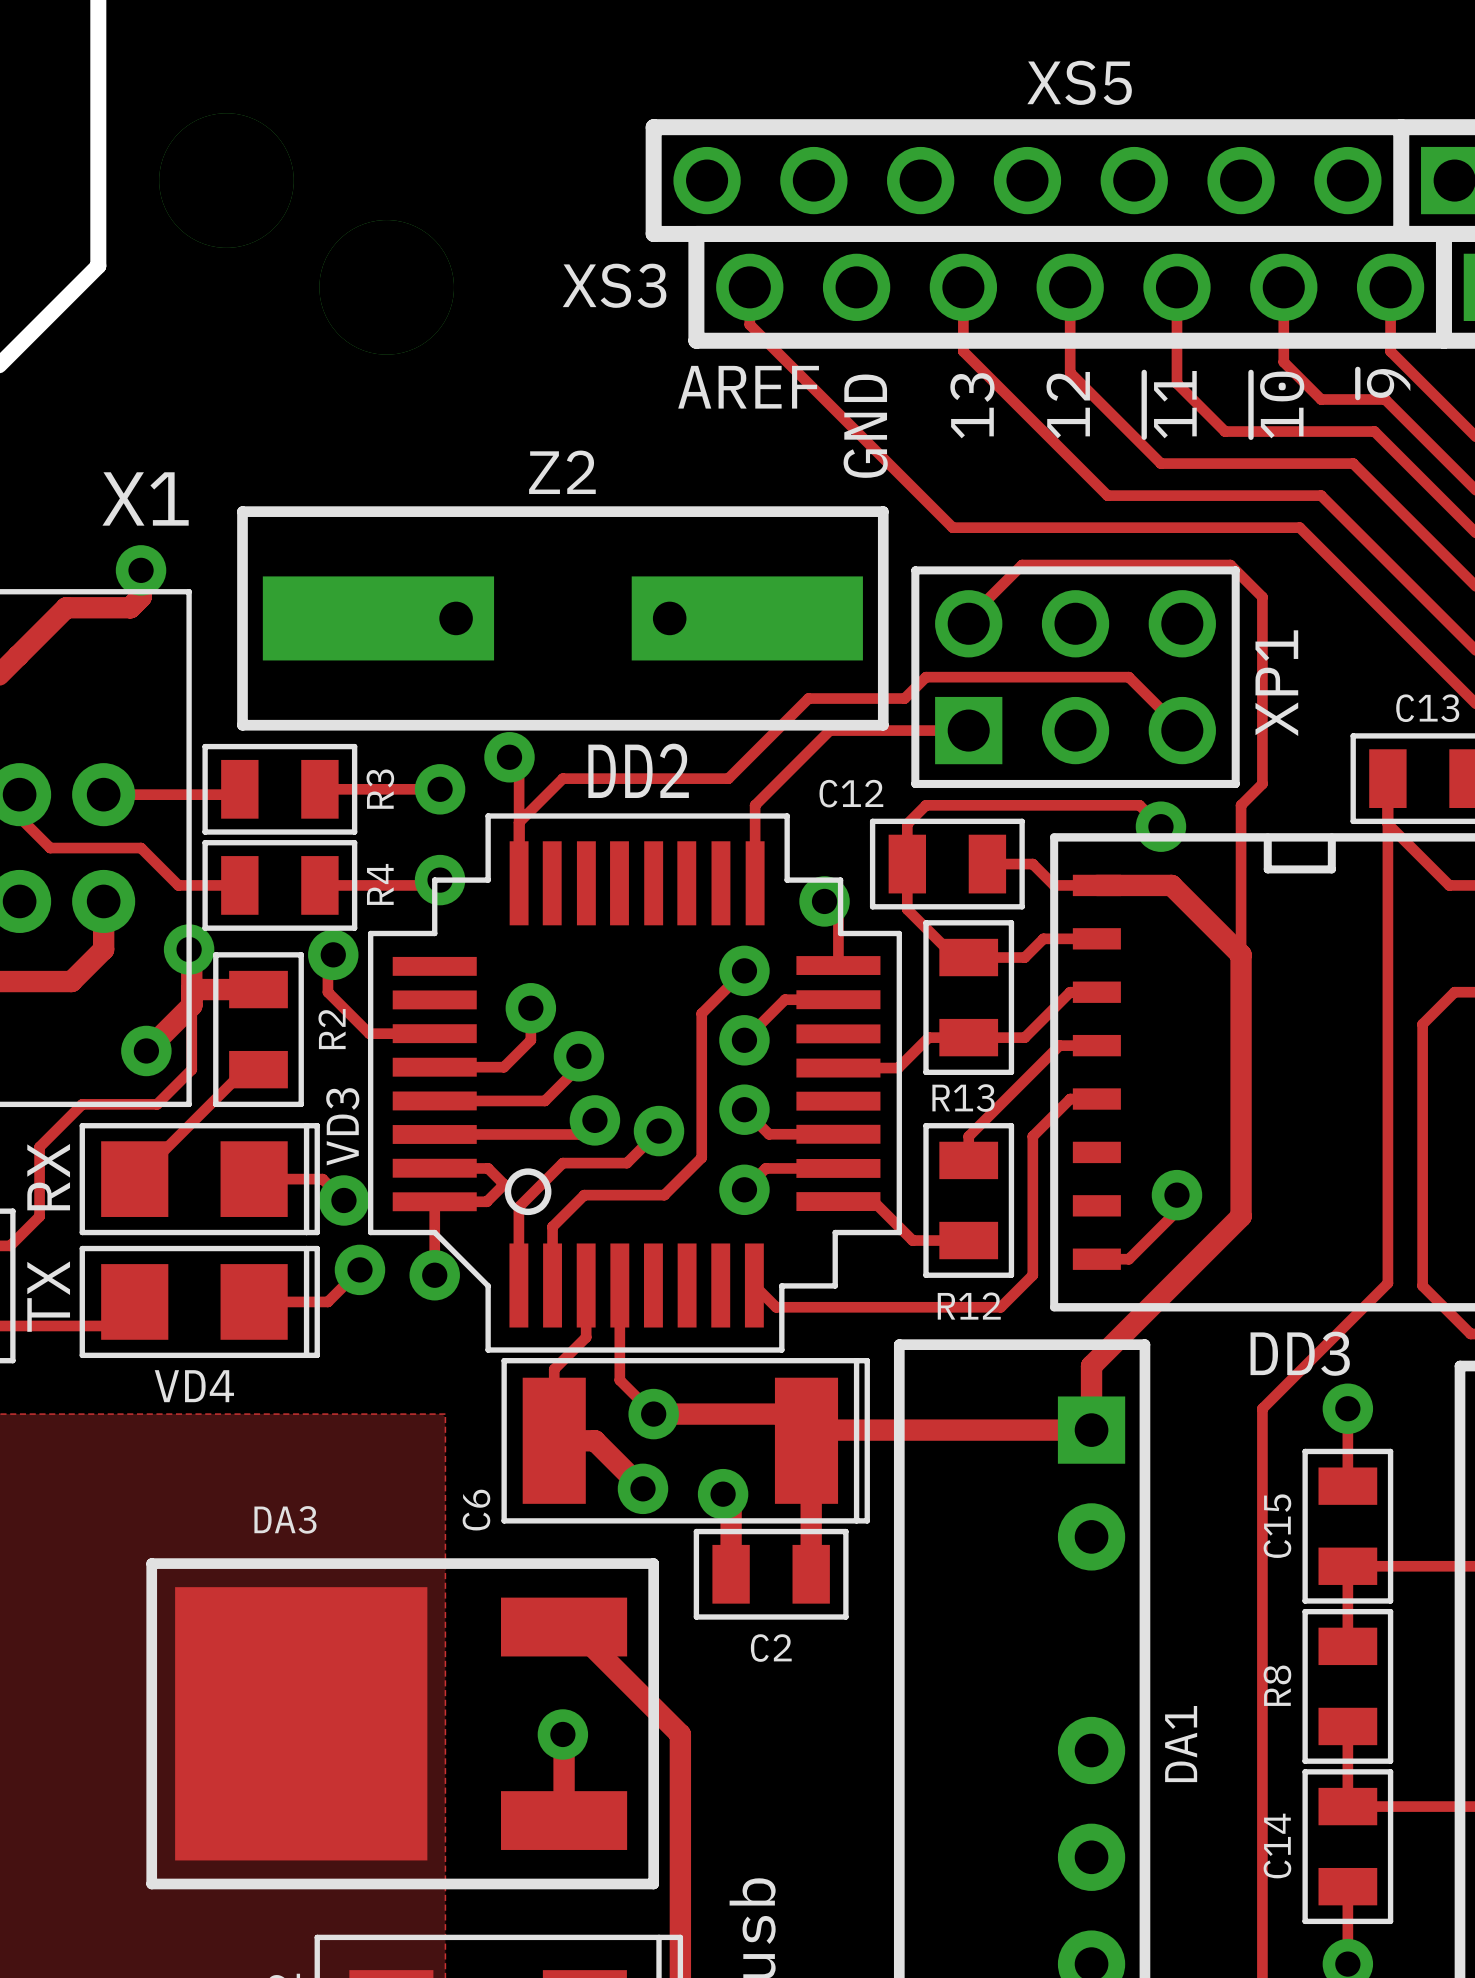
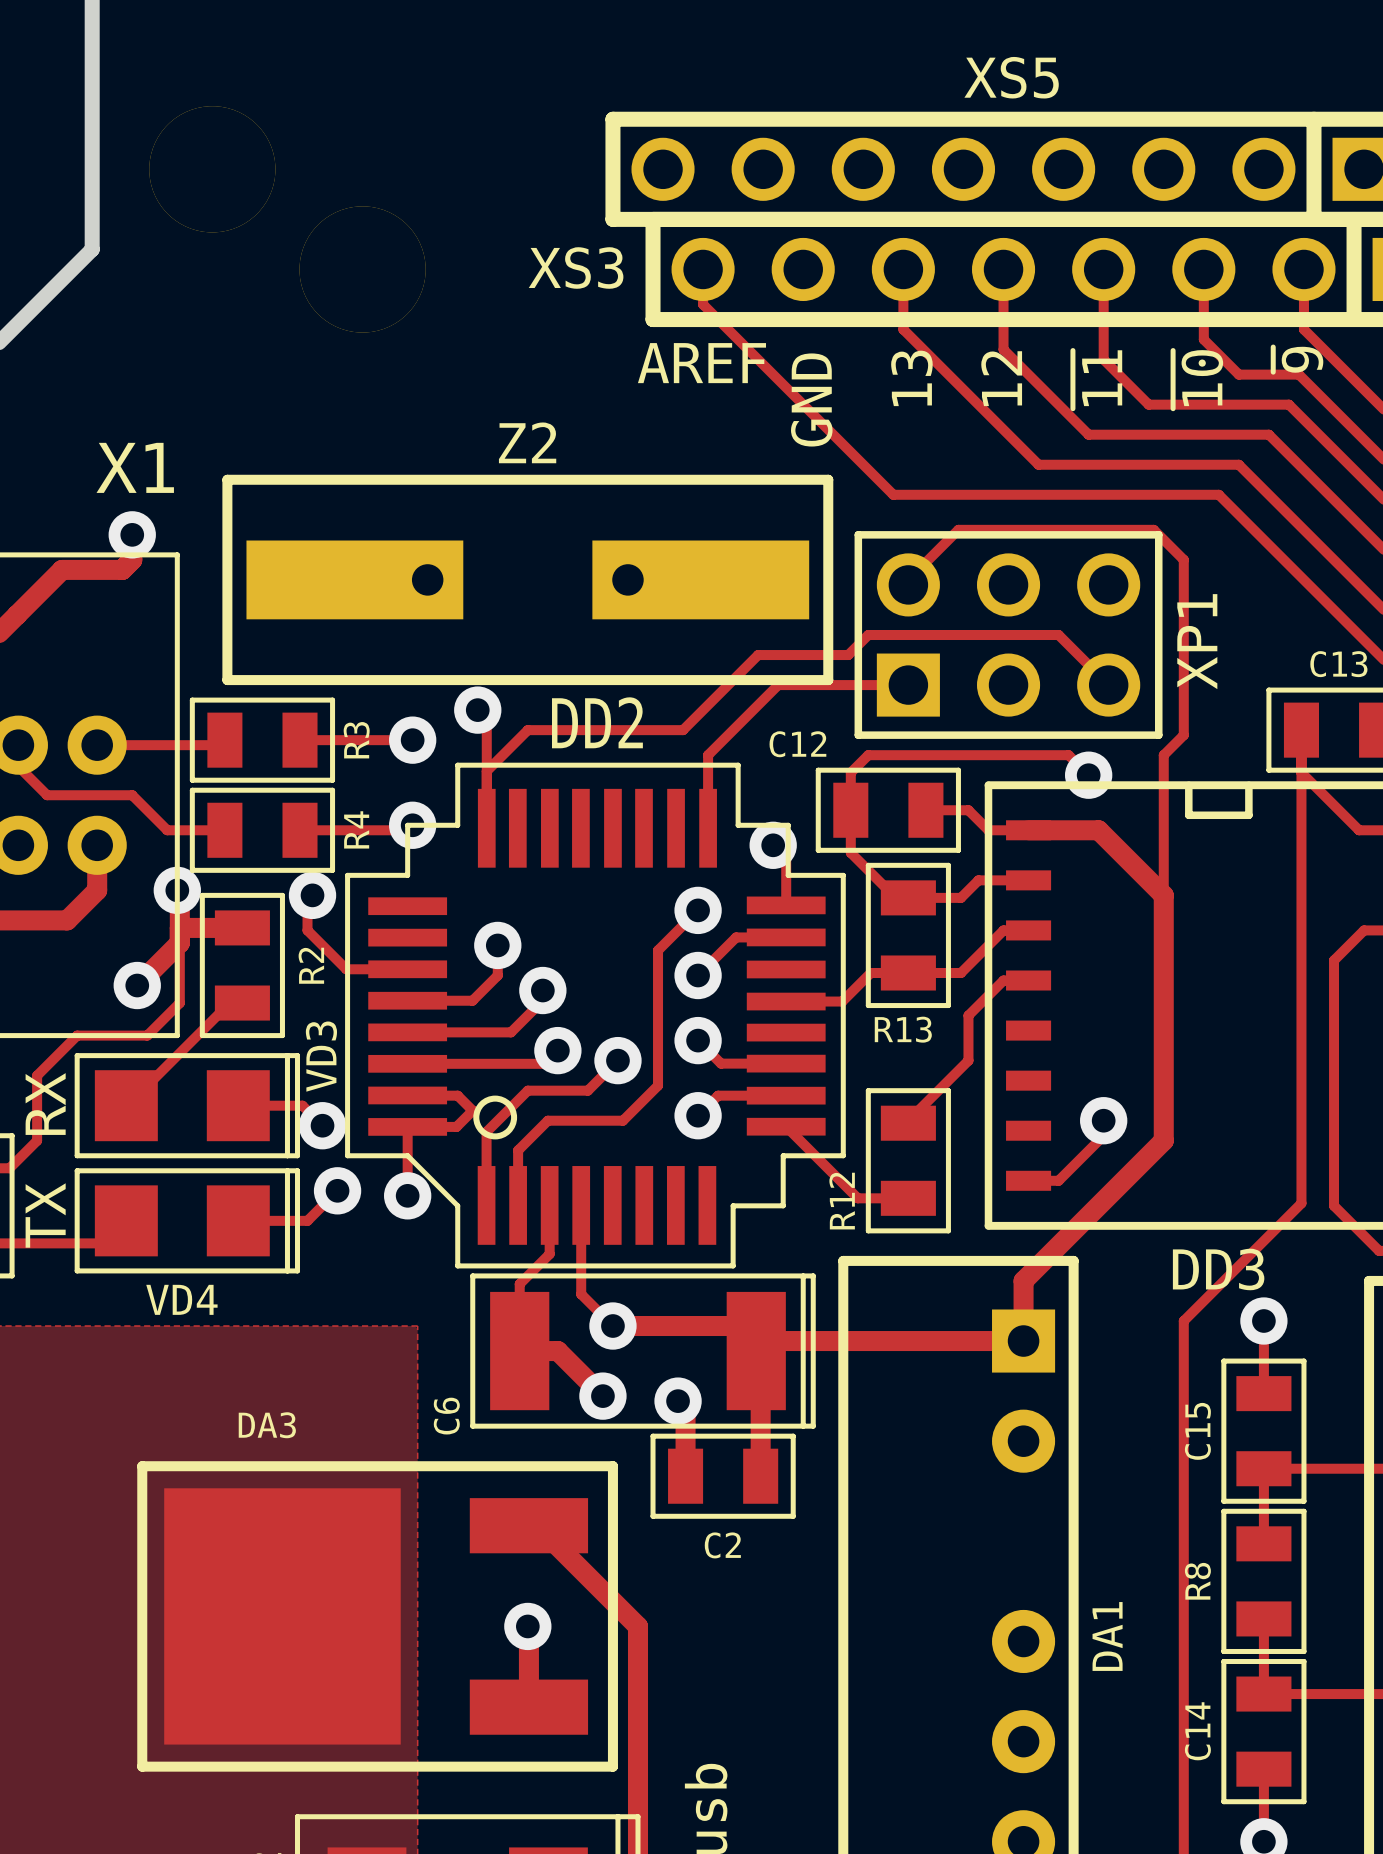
track: (1070, 1045) (1059, 1045) (968, 1136) (968, 1160) -> (1003, 980) (968, 1015) (968, 1060) (908, 1120) (908, 1123)
track: (1096, 1099) (1070, 1099) (1032, 1136) (1032, 1275) (1000, 1307) (776, 1307) (754, 1285) -> none
R12 position: (968, 1200) -> (908, 1160)
track: (838, 1201) (873, 1201) (912, 1240) (968, 1240) -> (786, 1126) (857, 1198) (908, 1198)
R12 name rotation: 0° (969, 1306) -> 90° counterclockwise (842, 1201)

